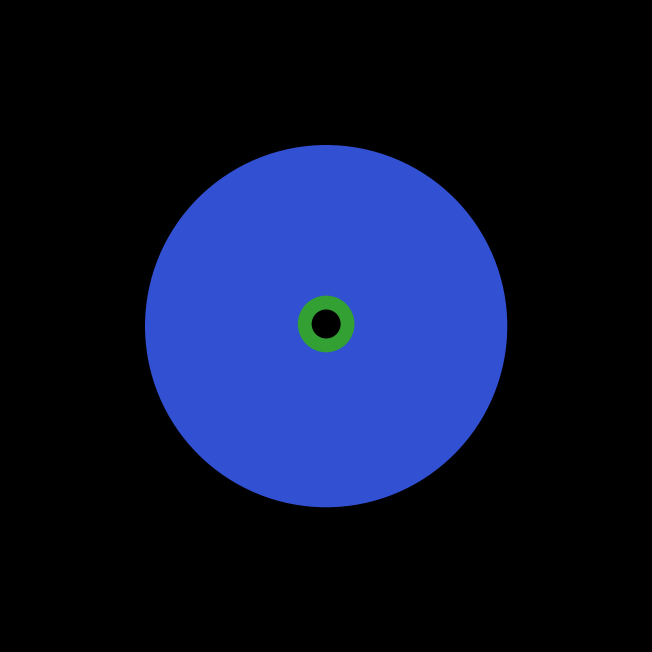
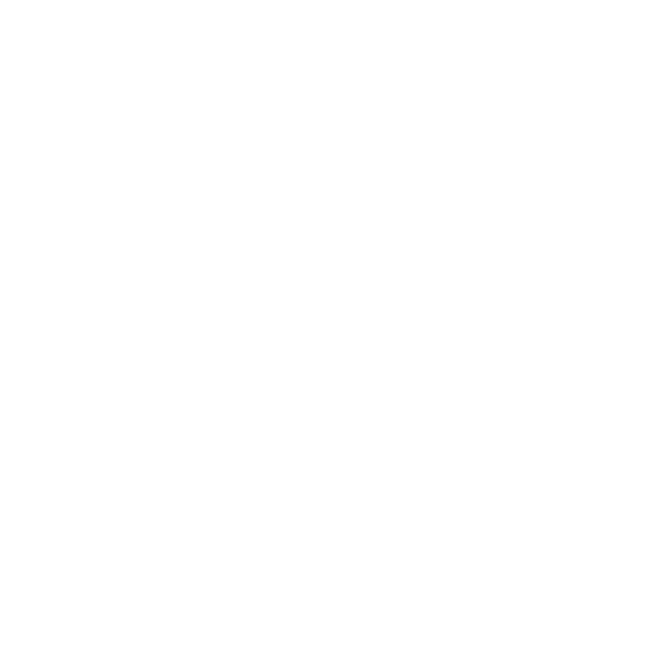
part: (326, 326) -> none

